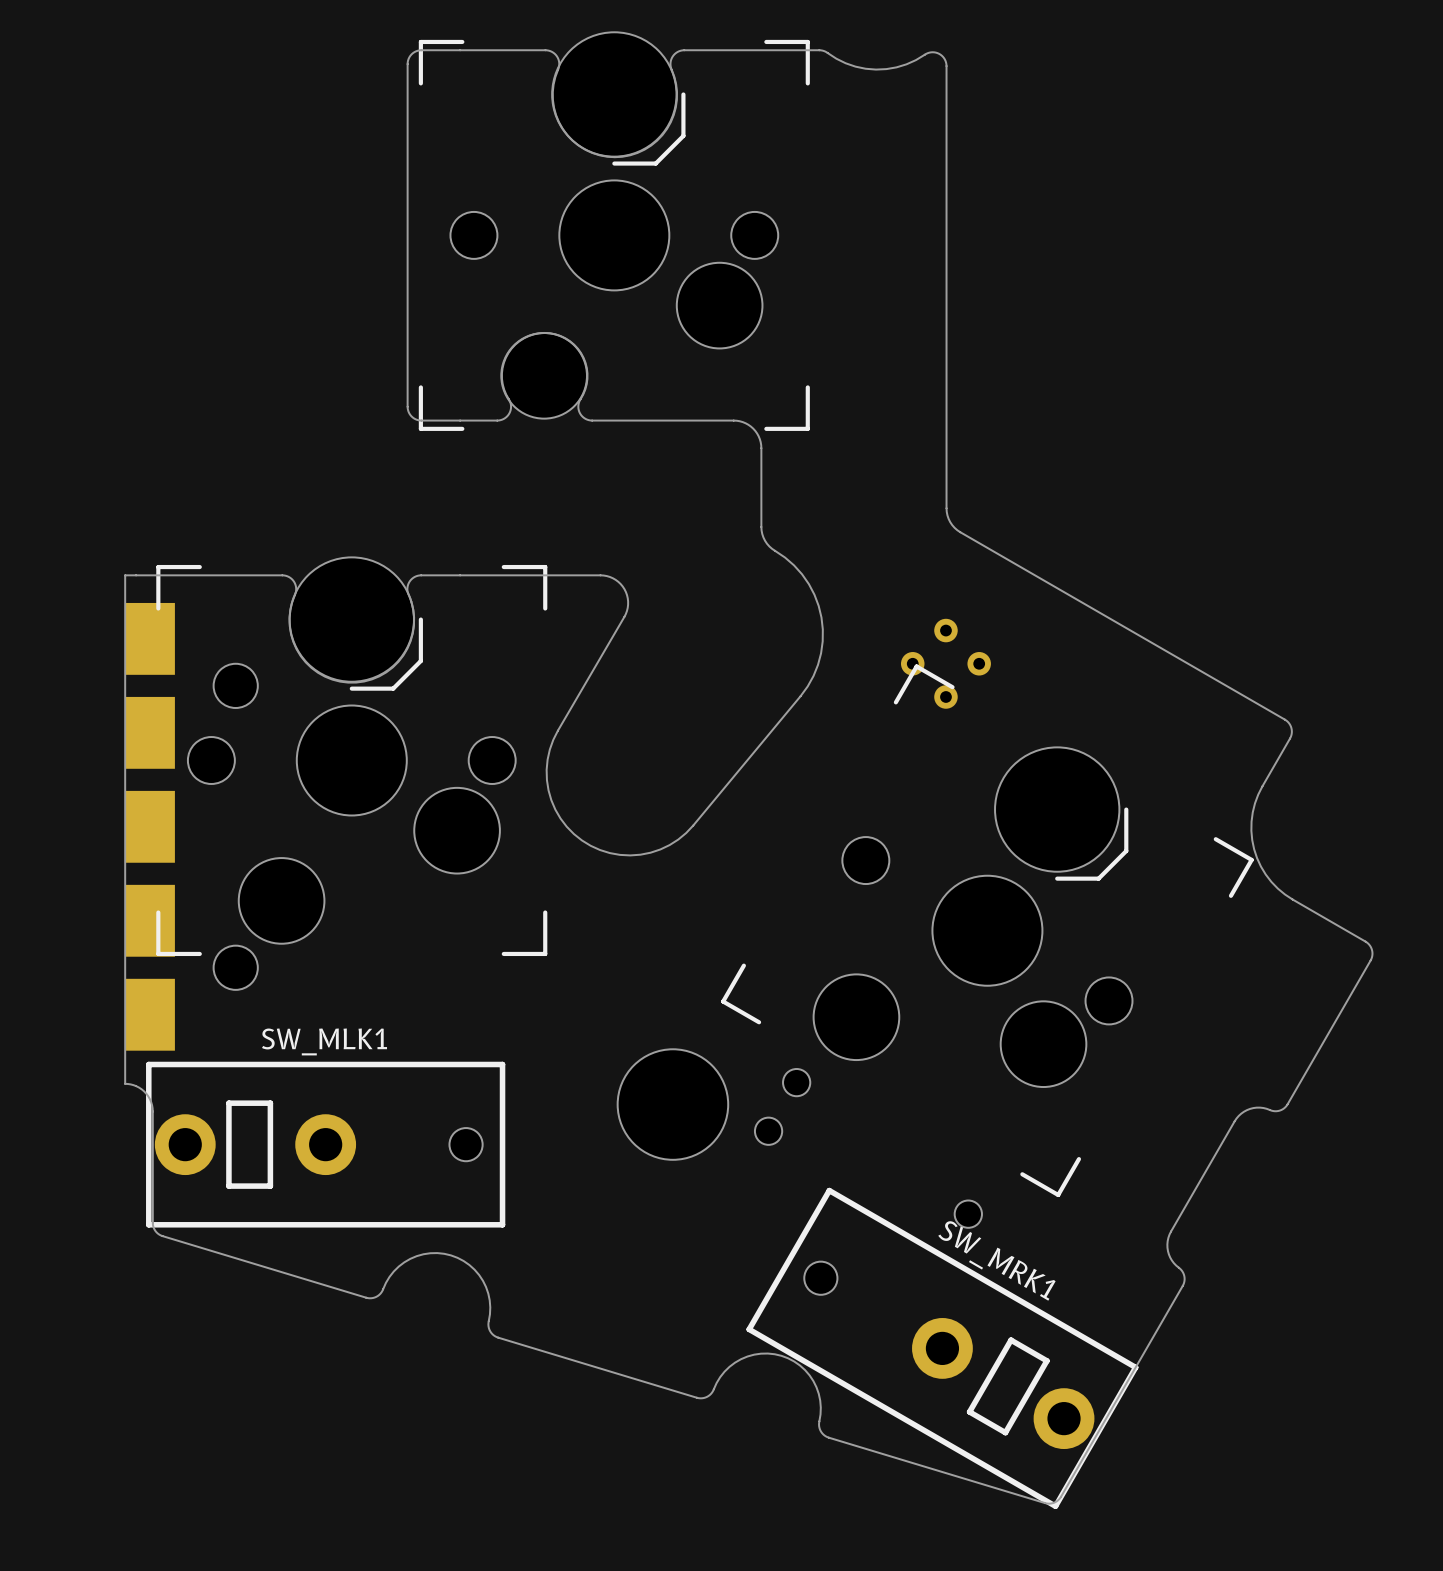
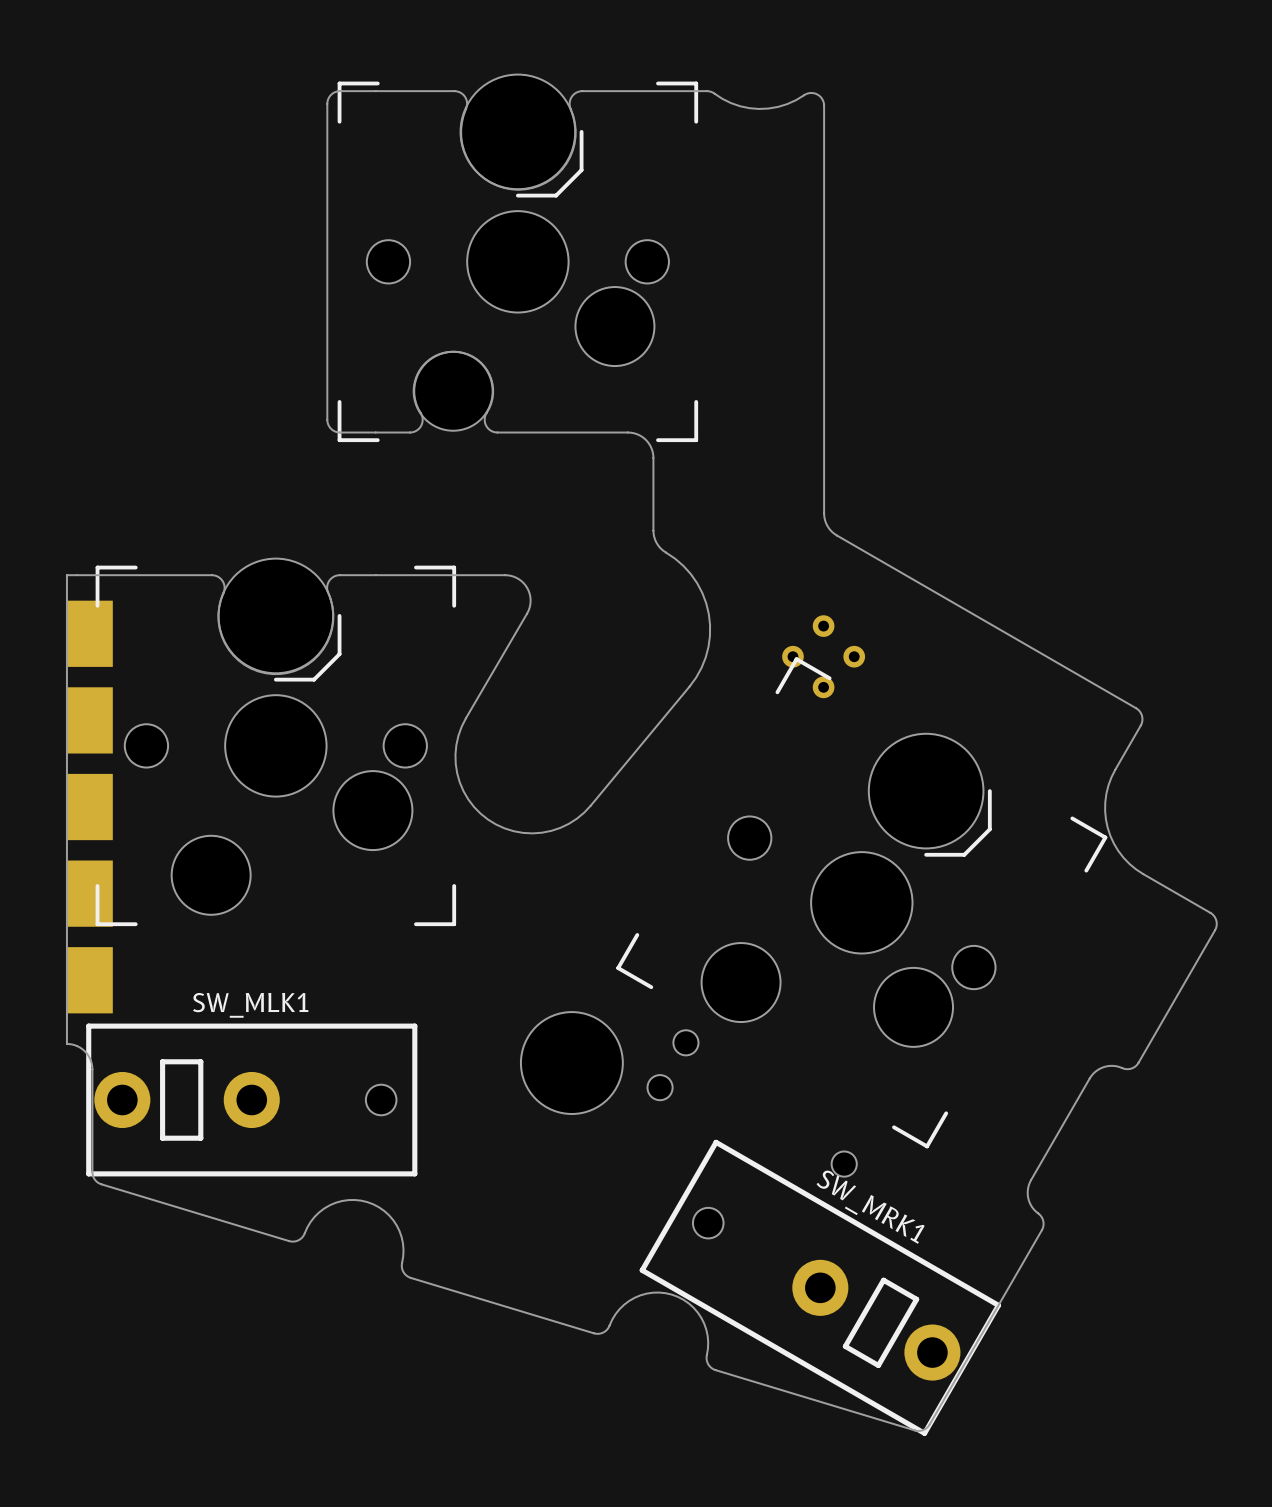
part: (191, 826) -> none

